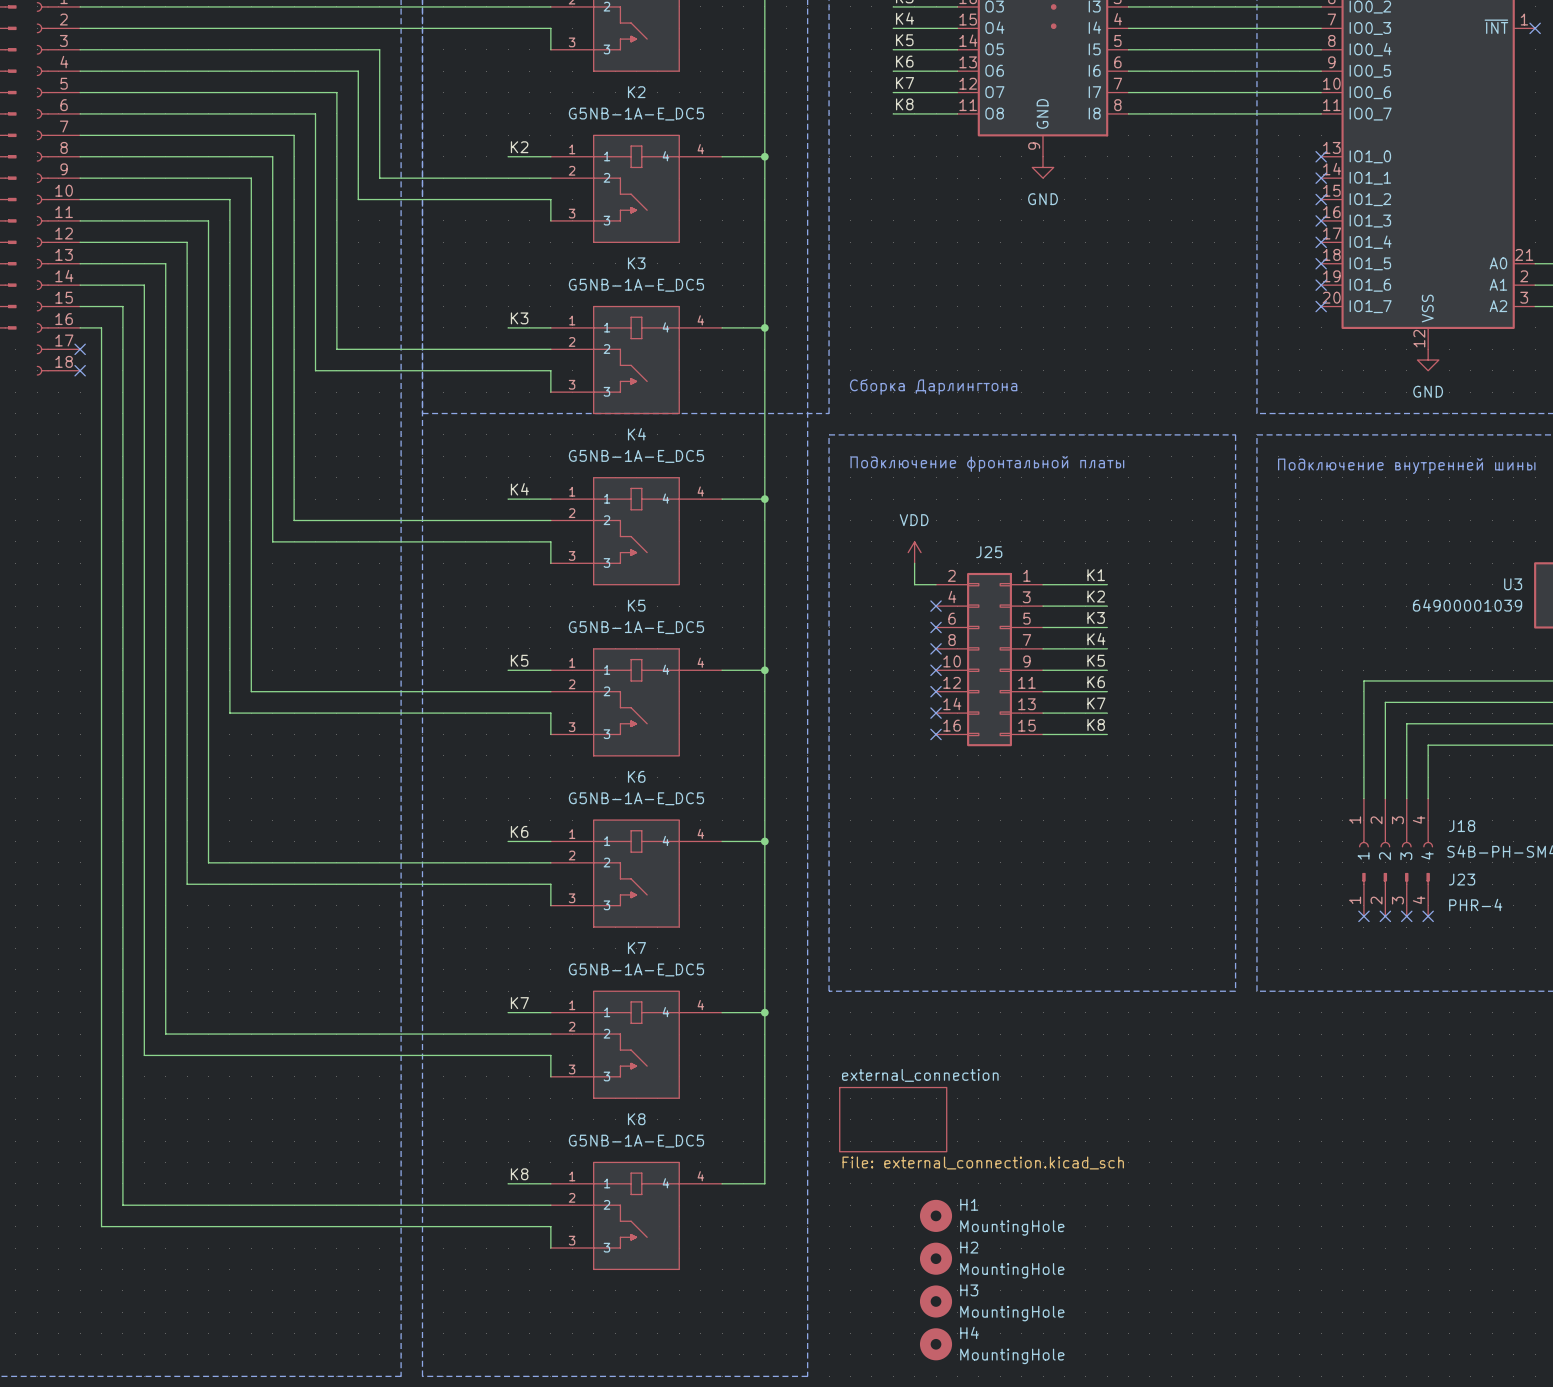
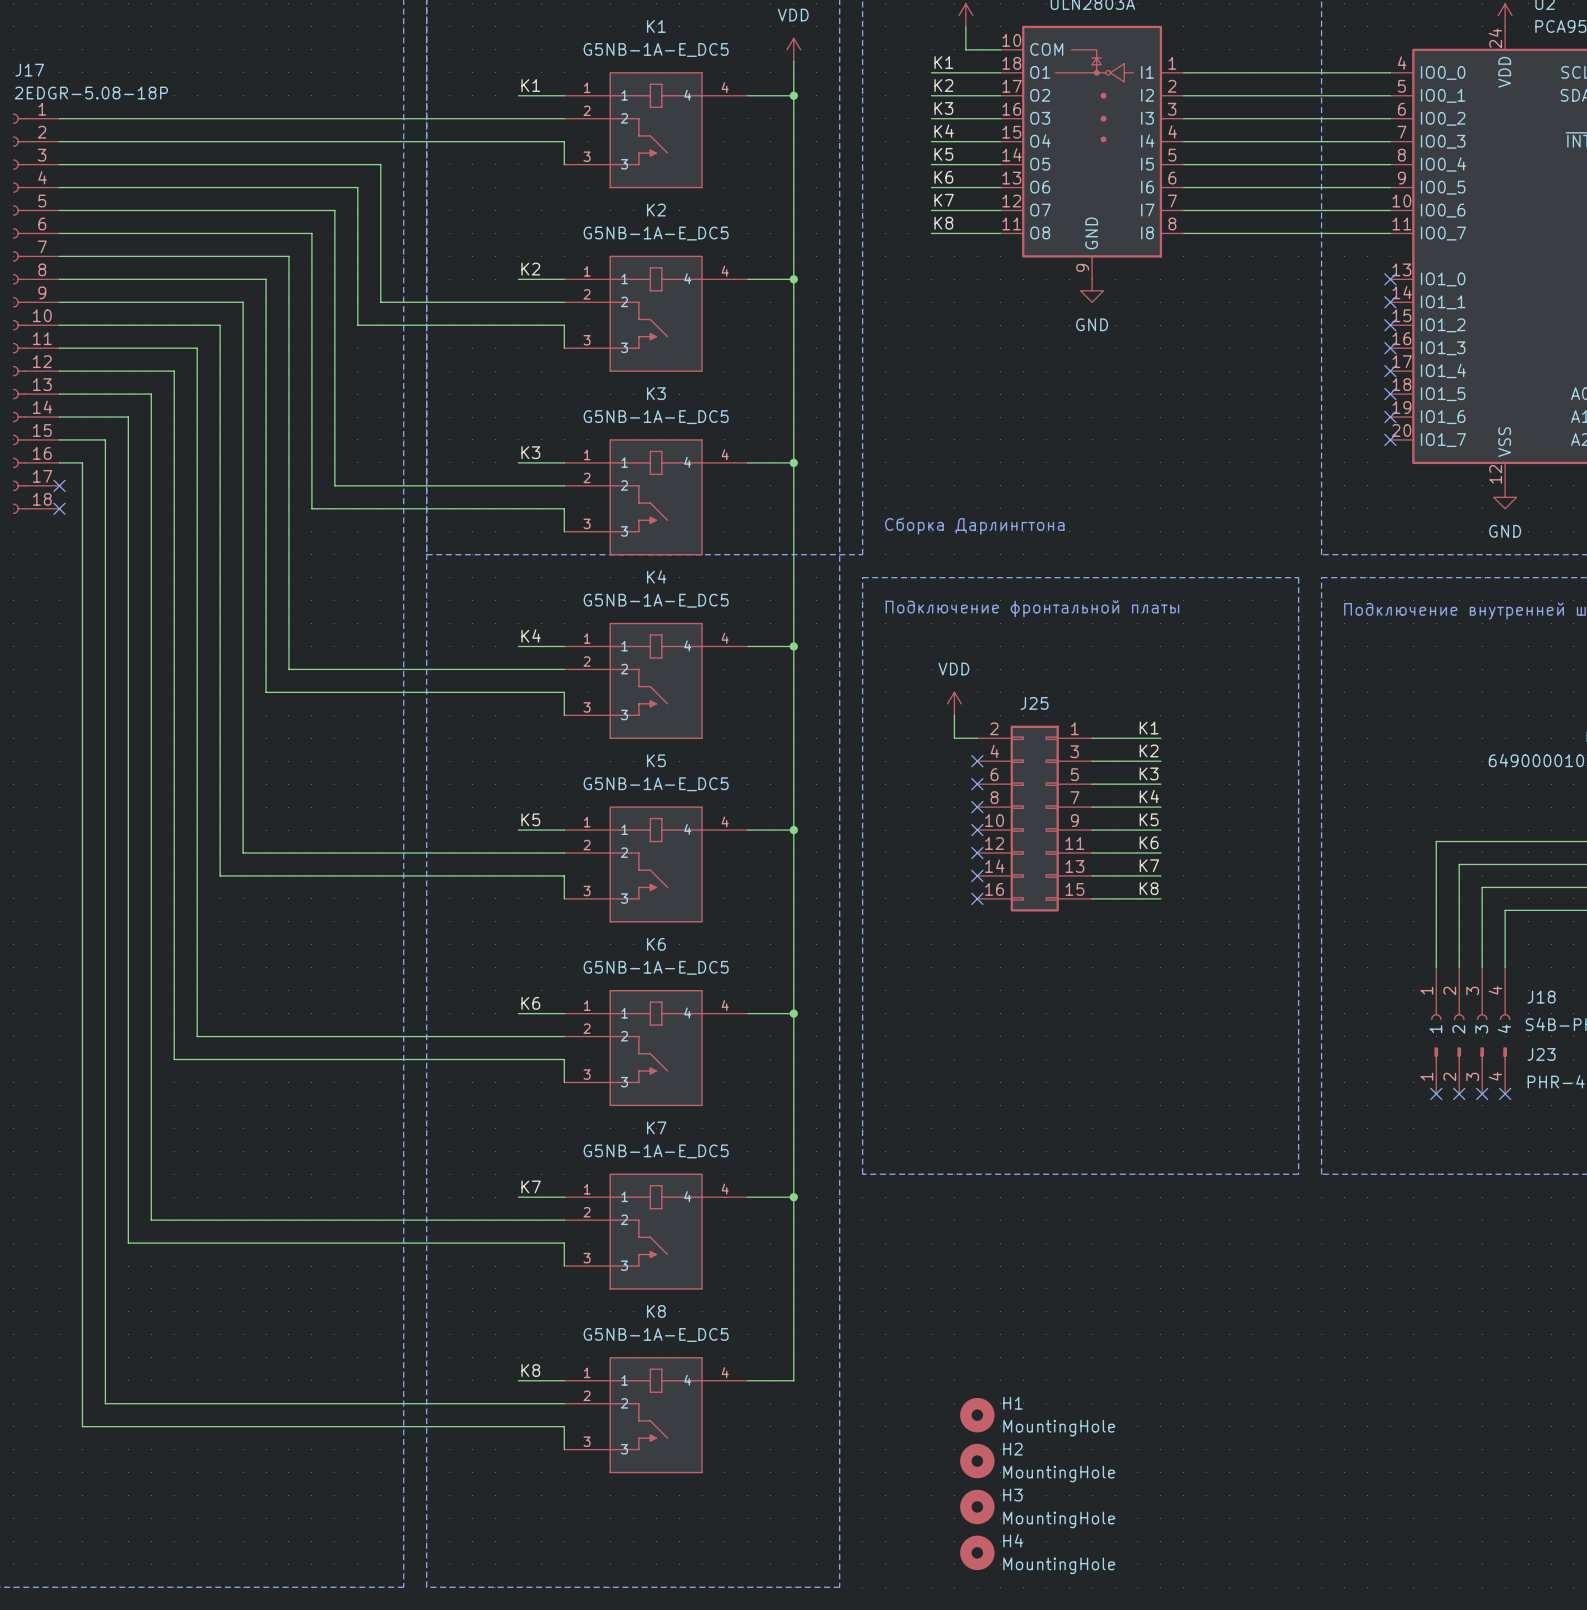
sheet external_connection: File: external_connection.kicad_sch (893, 1119) -> none

